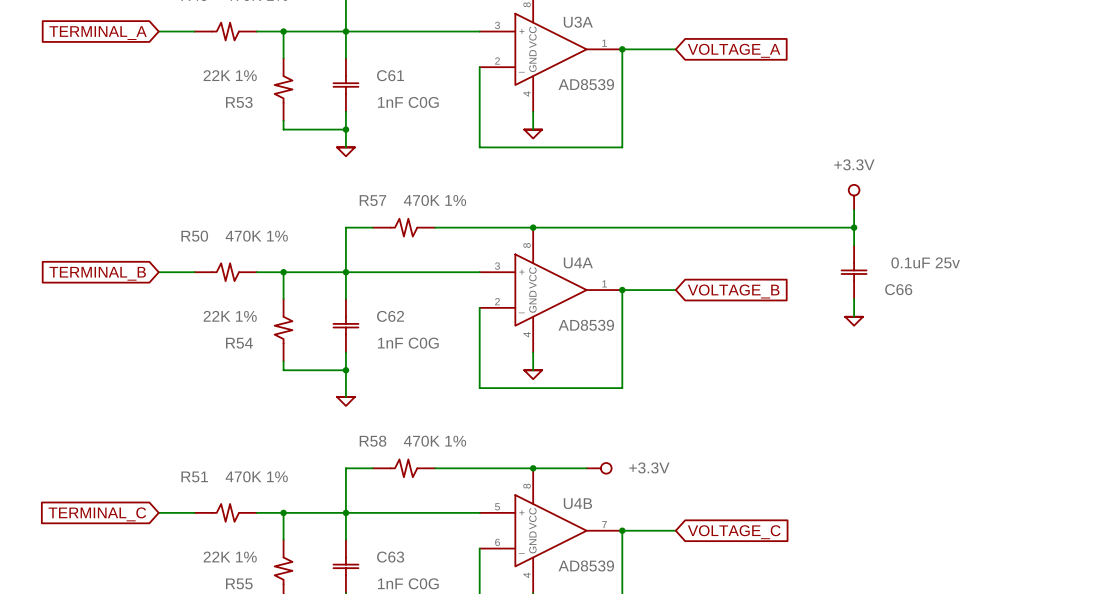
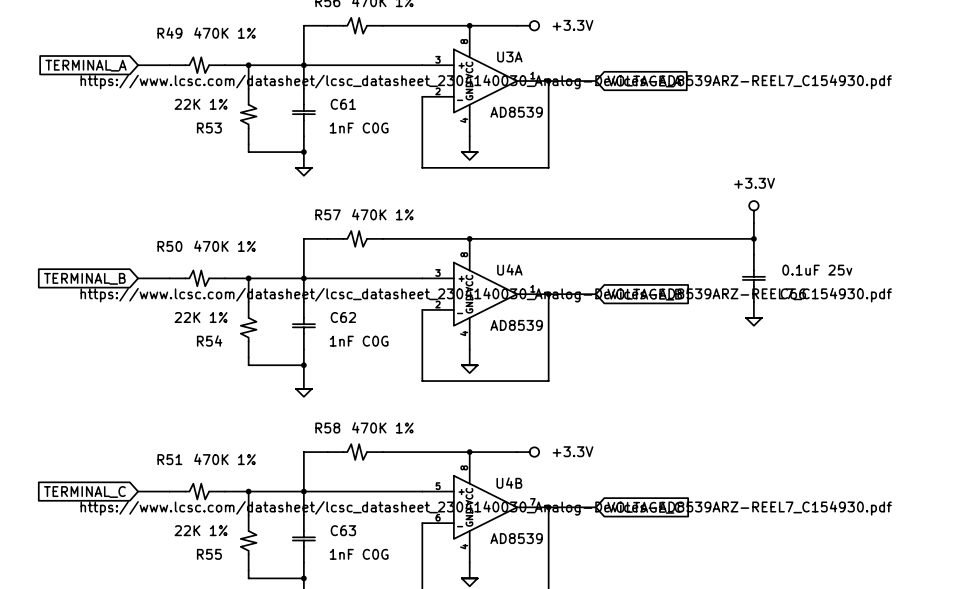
U3A text: none -> https://www.lcsc.com/datasheet/lcsc_datasheet_2304140030_Analog-Devices-AD8539ARZ-REEL7_C154930.pdf (486, 82)
U4A text: none -> https://www.lcsc.com/datasheet/lcsc_datasheet_2304140030_Analog-Devices-AD8539ARZ-REEL7_C154930.pdf (486, 295)
U4B text: none -> https://www.lcsc.com/datasheet/lcsc_datasheet_2304140030_Analog-Devices-AD8539ARZ-REEL7_C154930.pdf (486, 508)

